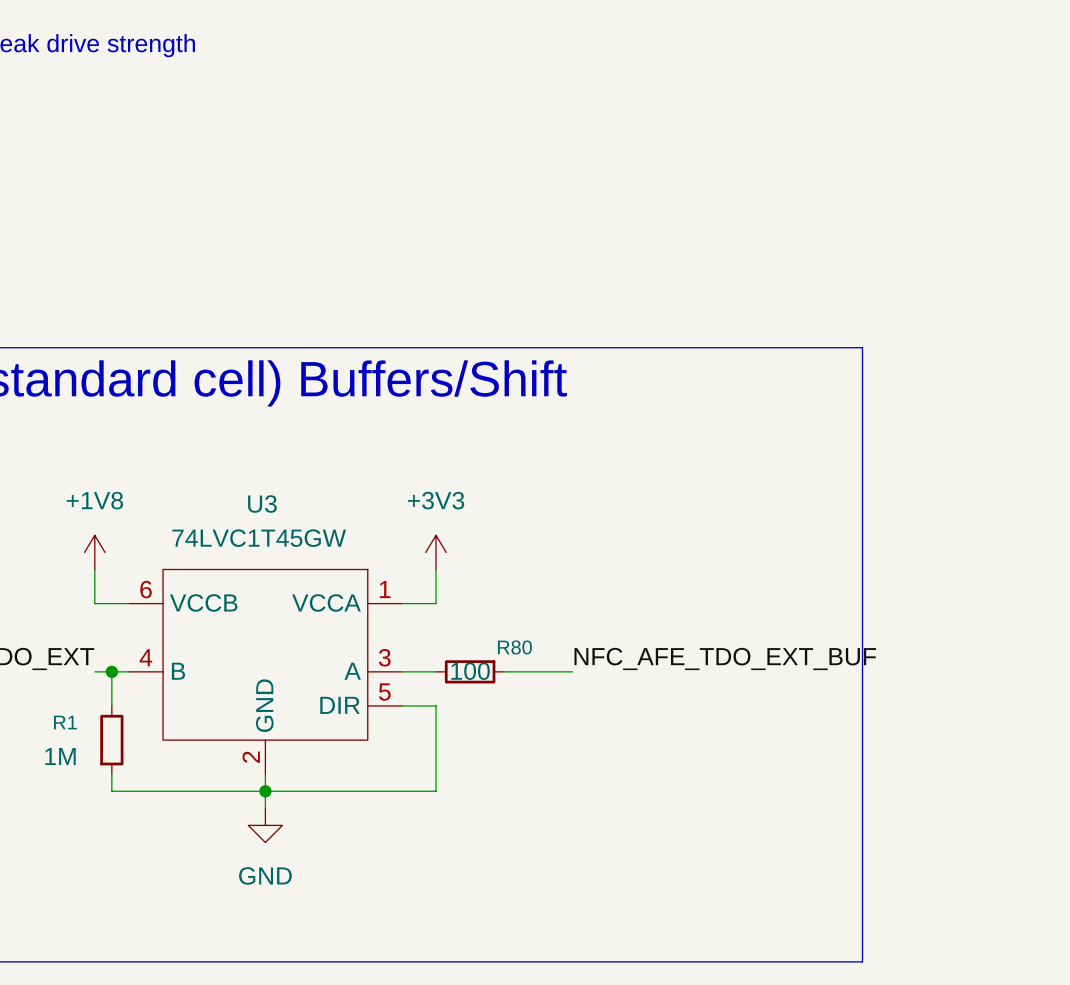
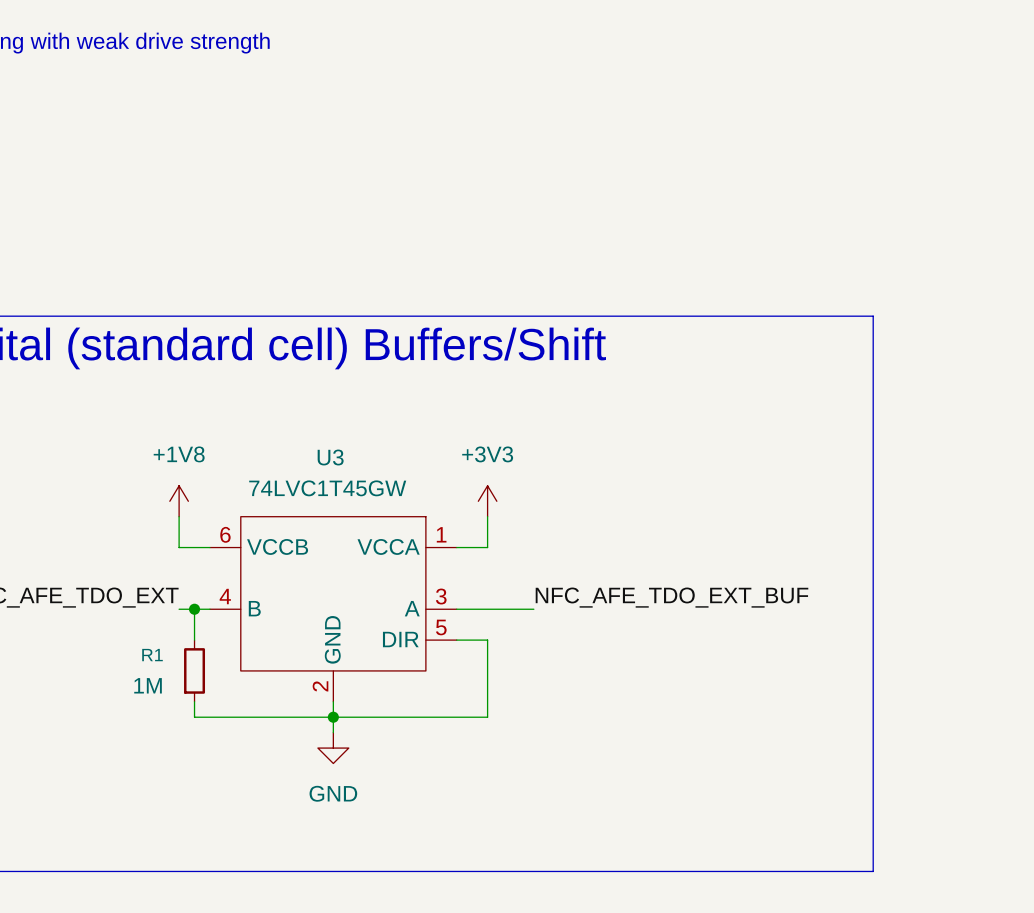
label position: NFC_AFE_TDO_EXT_BUF (725, 658) -> NFC_AFE_TDO_EXT_BUF (672, 597)
wire: none -> (487, 609) (533, 609)
R80: 100 (470, 671) -> none
wire: (504, 671) (572, 671) -> none

